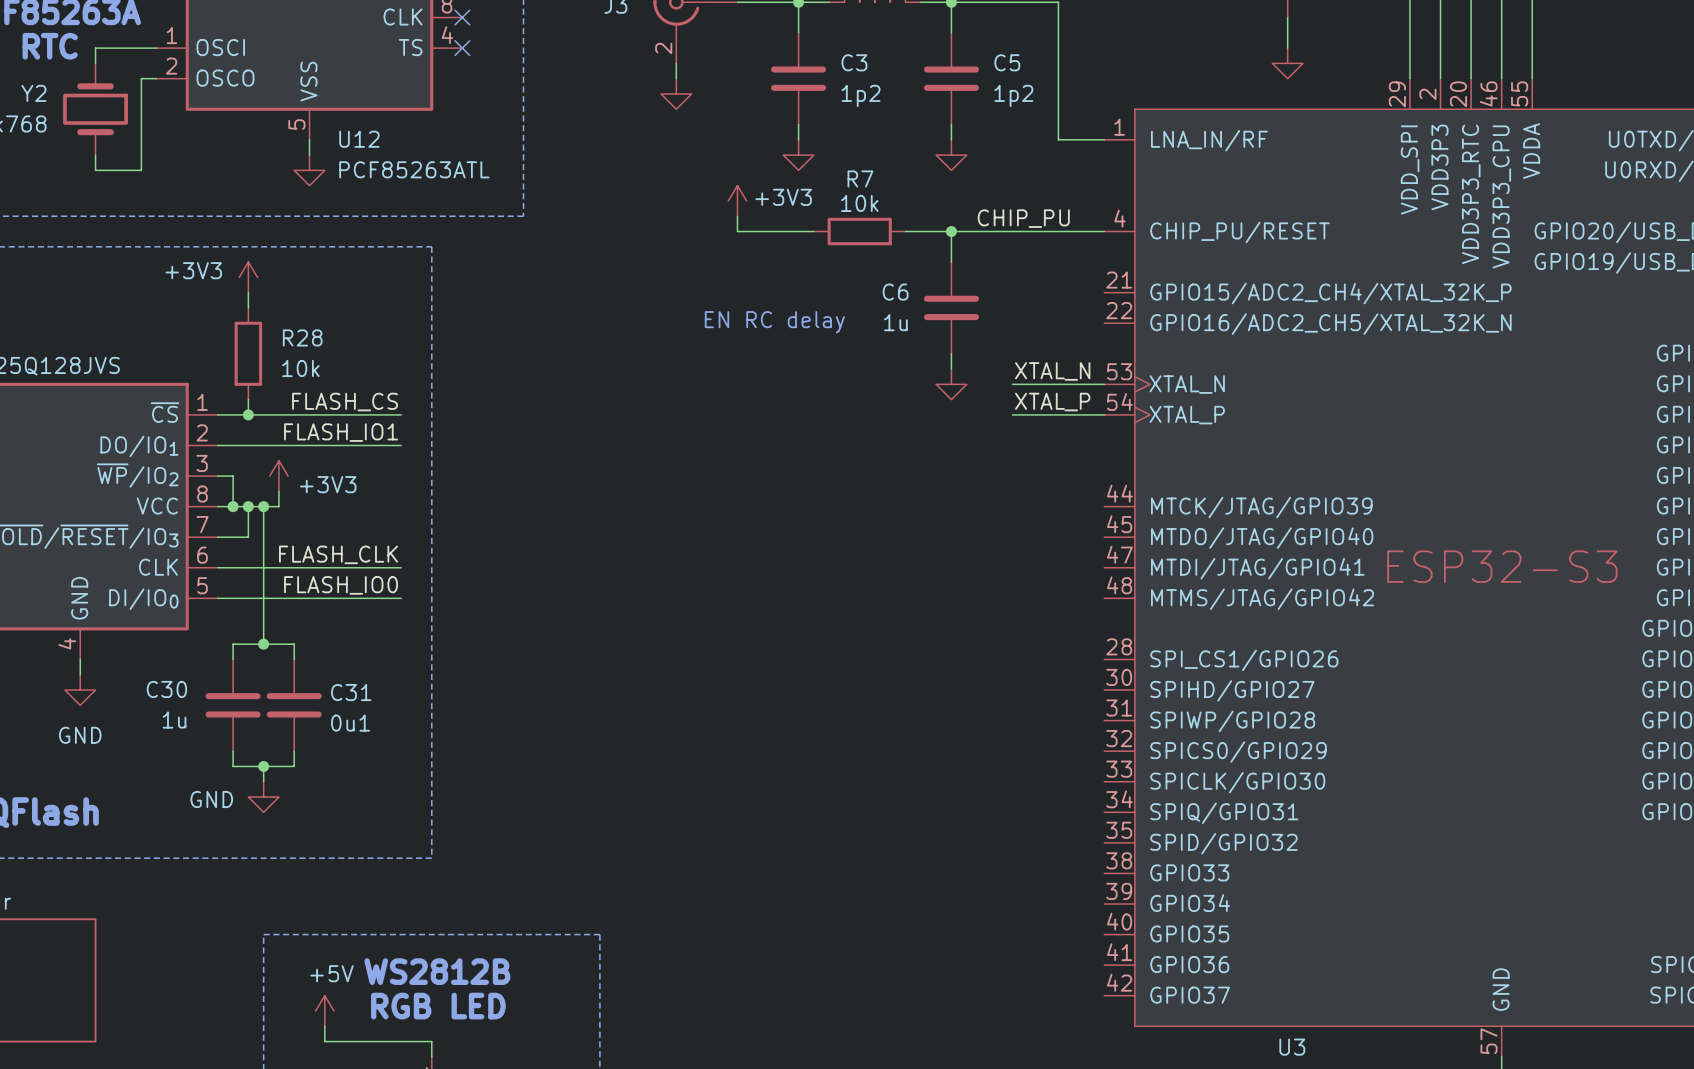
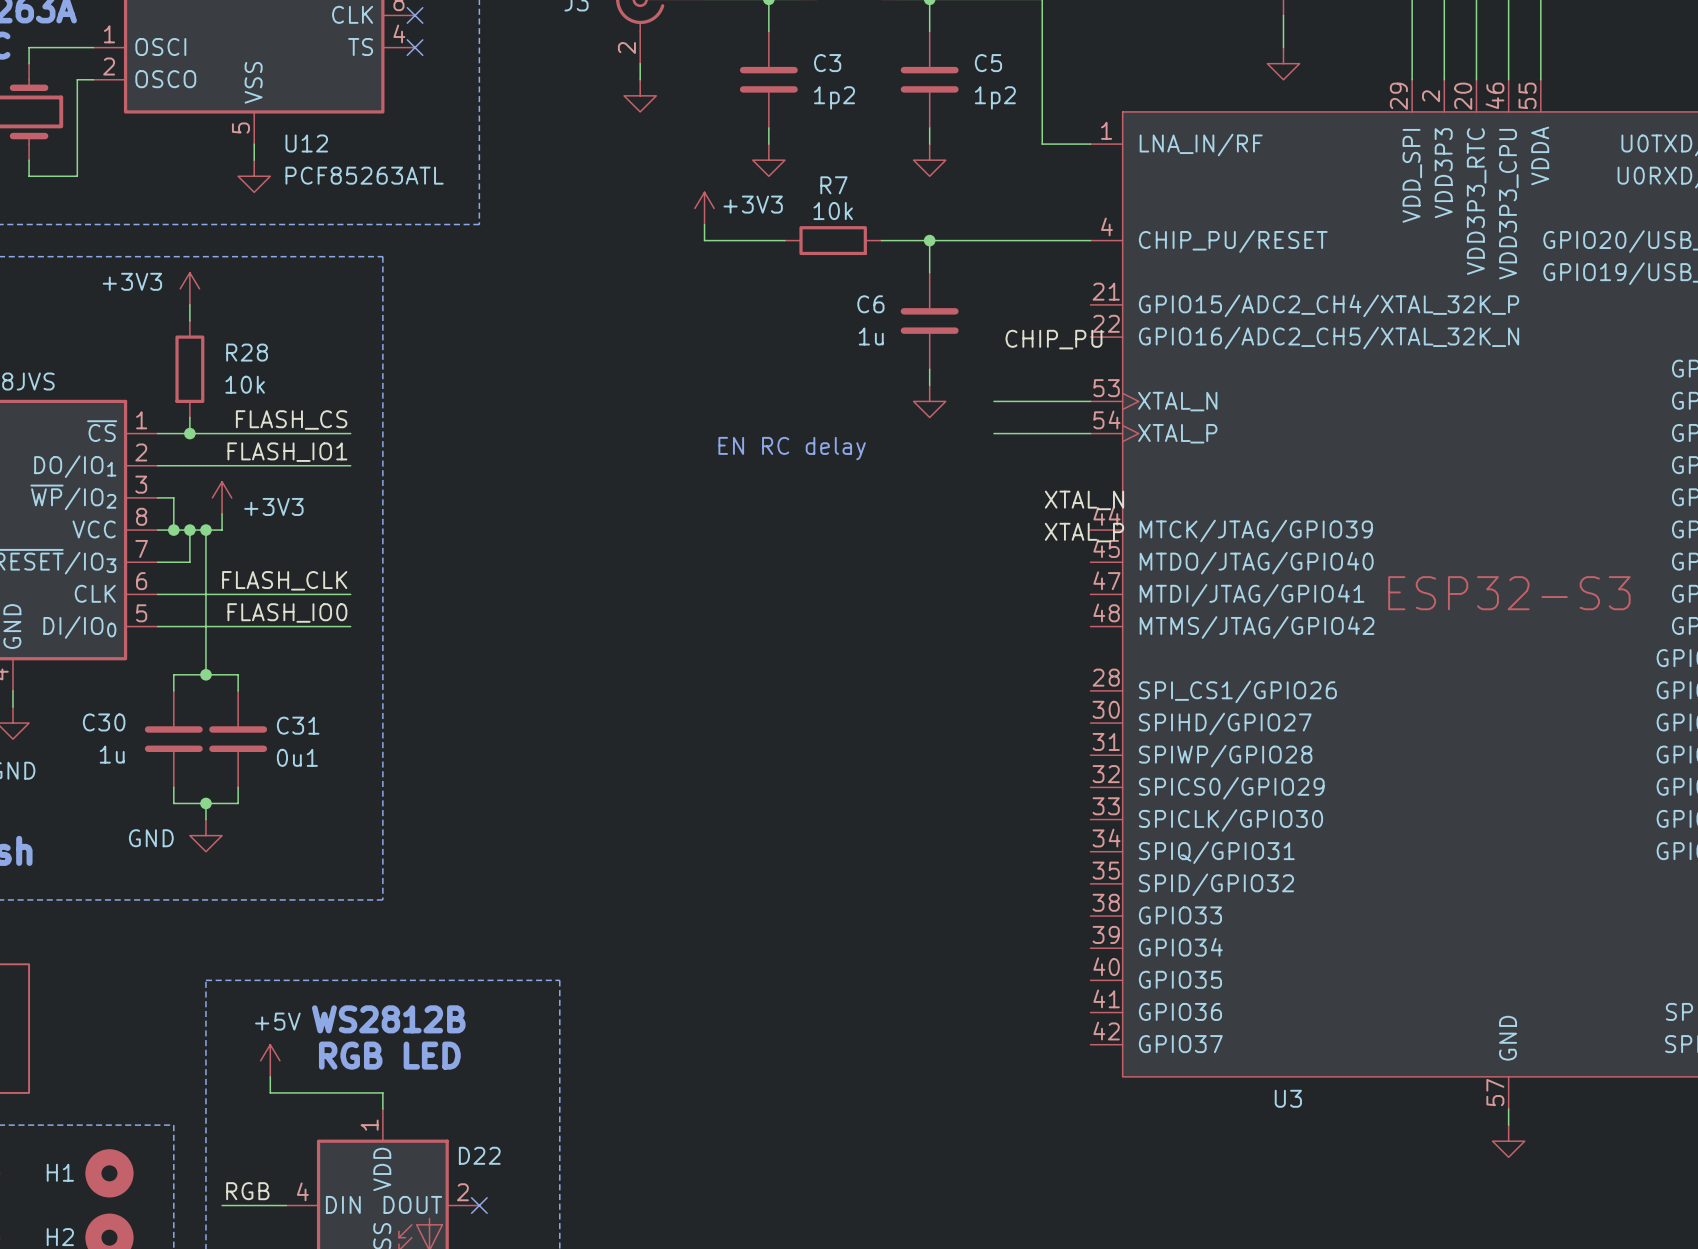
label position: CHIP_PU (1023, 218) -> CHIP_PU (1054, 339)
text position: EN RC delay (774, 322) -> EN RC delay (792, 448)
label position: XTAL_N (1052, 371) -> XTAL_N (1084, 500)
label position: XTAL_P (1052, 402) -> XTAL_P (1084, 532)

